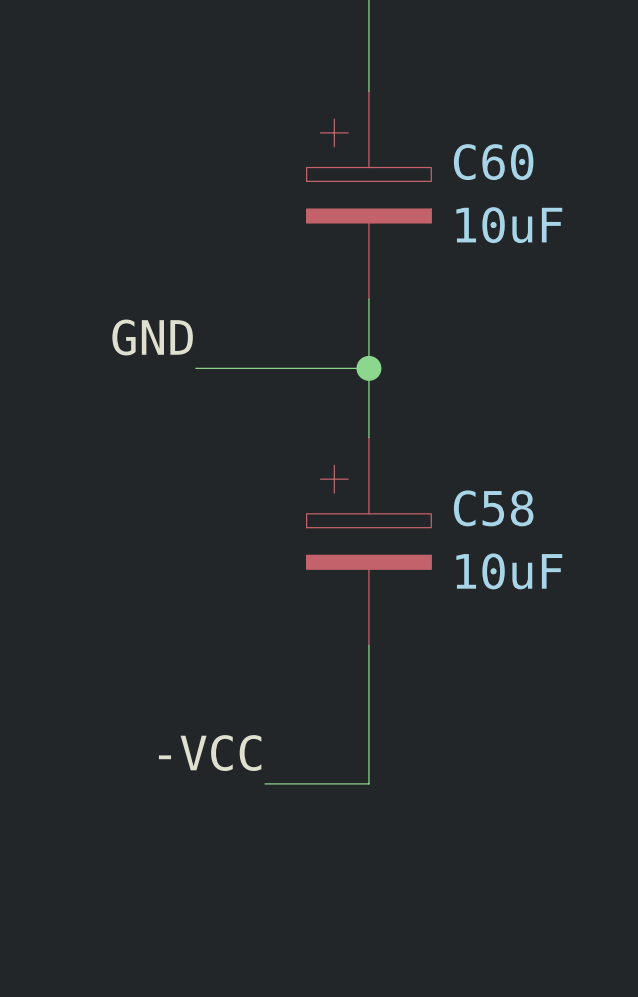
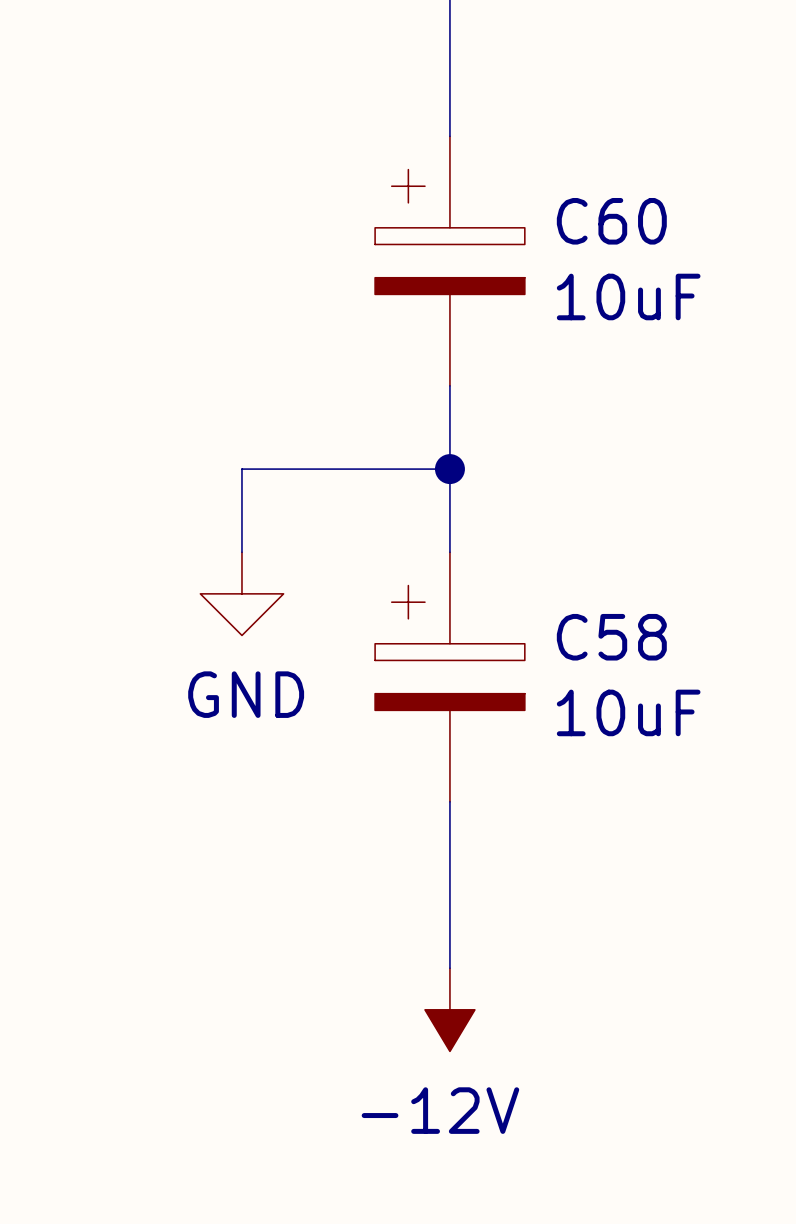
label: GND (152, 337) -> none
wire: none -> (241, 469) (241, 552)
power symbol: none -> GND (241, 593)
label: -VCC (210, 753) -> none
wire: (265, 783) (368, 783) -> none
power symbol: none -> -12V (449, 1009)

